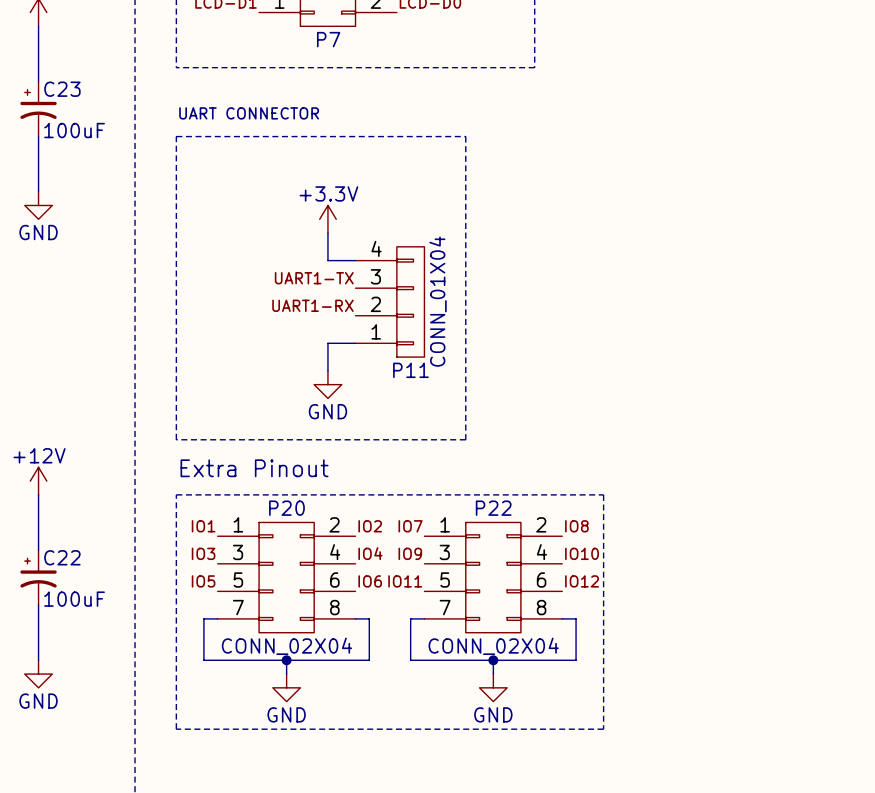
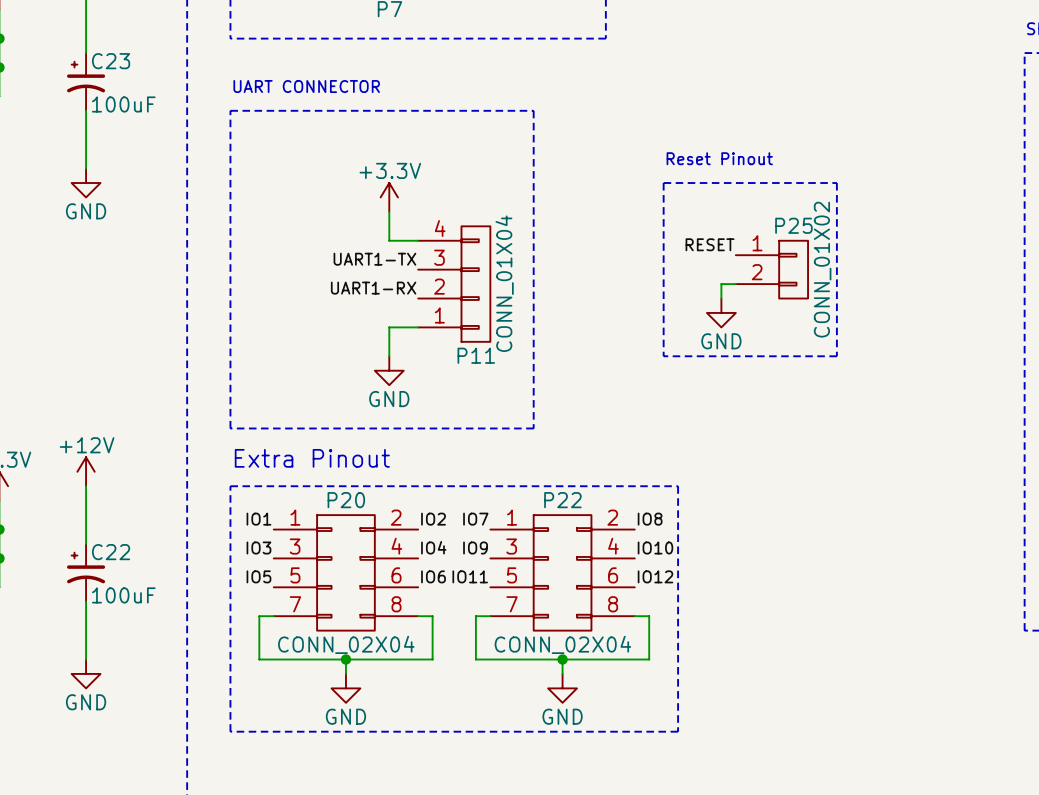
text: none -> Reset Pinout (719, 158)
line: none -> (663, 183) (663, 356) (836, 356) (836, 183) (663, 183)
label: none -> RESET (710, 244)
P25: none -> CONN_01X02 (771, 269)
wire: none -> (735, 284) (721, 284) (721, 298)
power symbol: none -> GND (721, 312)

